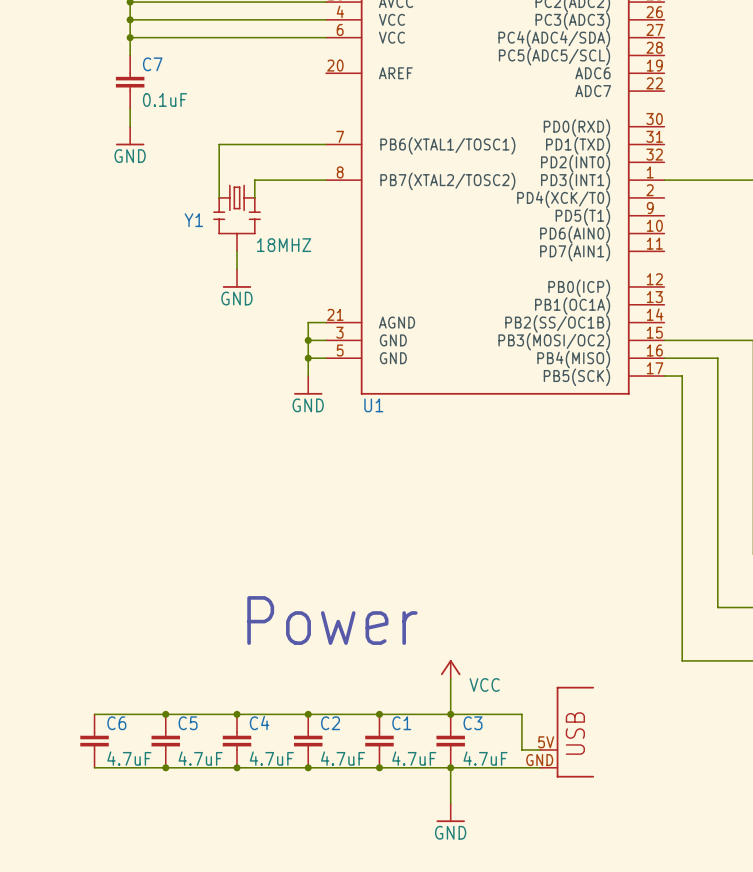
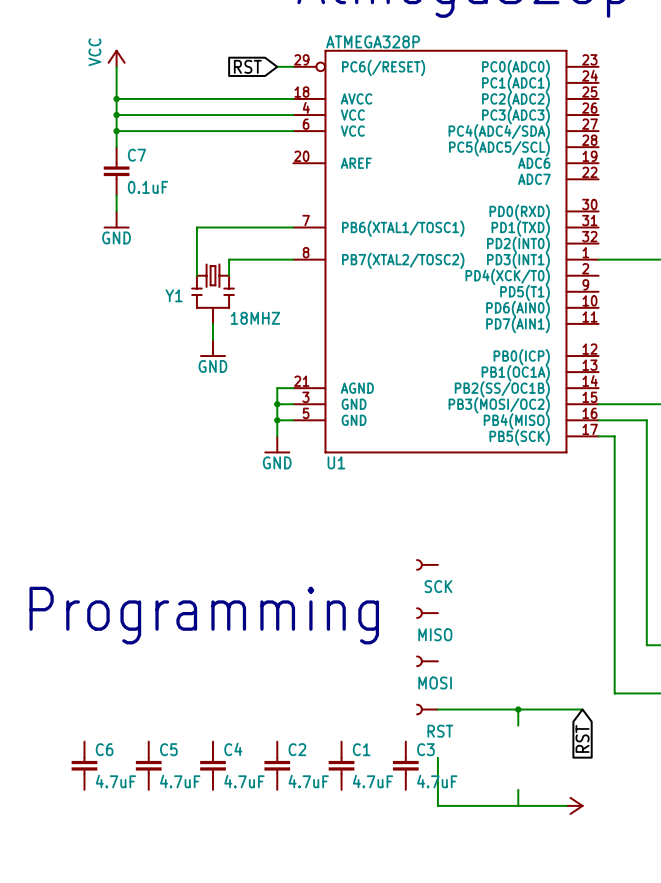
SCK: none -> (427, 564)
MISO: none -> (427, 613)
text: none -> Programming (204, 615)
text: Power (332, 620) -> none
MOSI: none -> (427, 661)
power symbol: VCC (450, 669) -> none
wire: (450, 678) (450, 714) -> none
RST: none -> (427, 709)
wire: none -> (437, 709) (582, 709)
wire: none -> (518, 709) (518, 725)
junction: none -> (518, 709)
global label: none -> RST (582, 738)
wire: (94, 714) (521, 714) (521, 749) (539, 749) -> none
junction: (165, 714) -> none
junction: (237, 714) -> none
junction: (308, 714) -> none
junction: (379, 714) -> none
junction: (450, 714) -> none
wire: none -> (437, 757) (437, 805) (566, 805)
part: (566, 732) -> none
wire: (94, 767) (539, 767) -> none
junction: (165, 767) -> none
junction: (237, 767) -> none
junction: (308, 767) -> none
junction: (379, 767) -> none
wire: (450, 767) (450, 803) -> none
junction: (450, 767) -> none
wire: none -> (518, 789) (518, 805)
power symbol: none -> (574, 805)
power symbol: GND (450, 812) -> none

